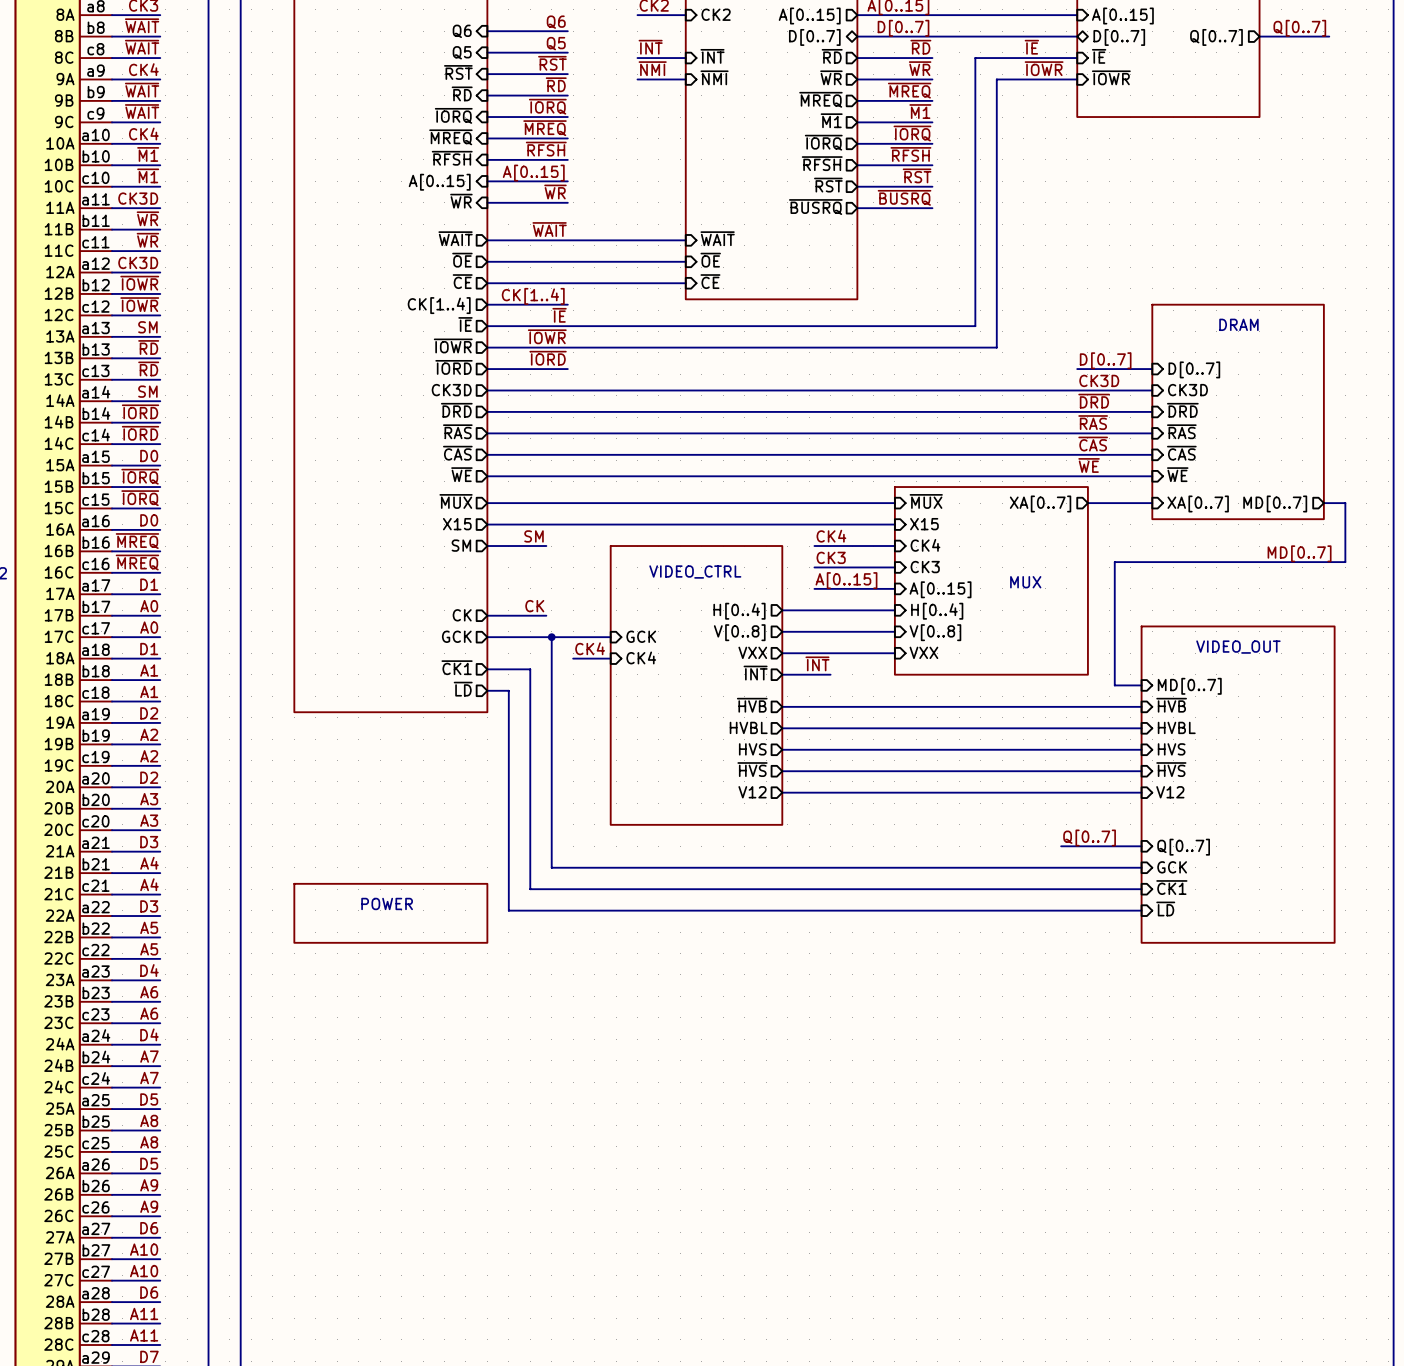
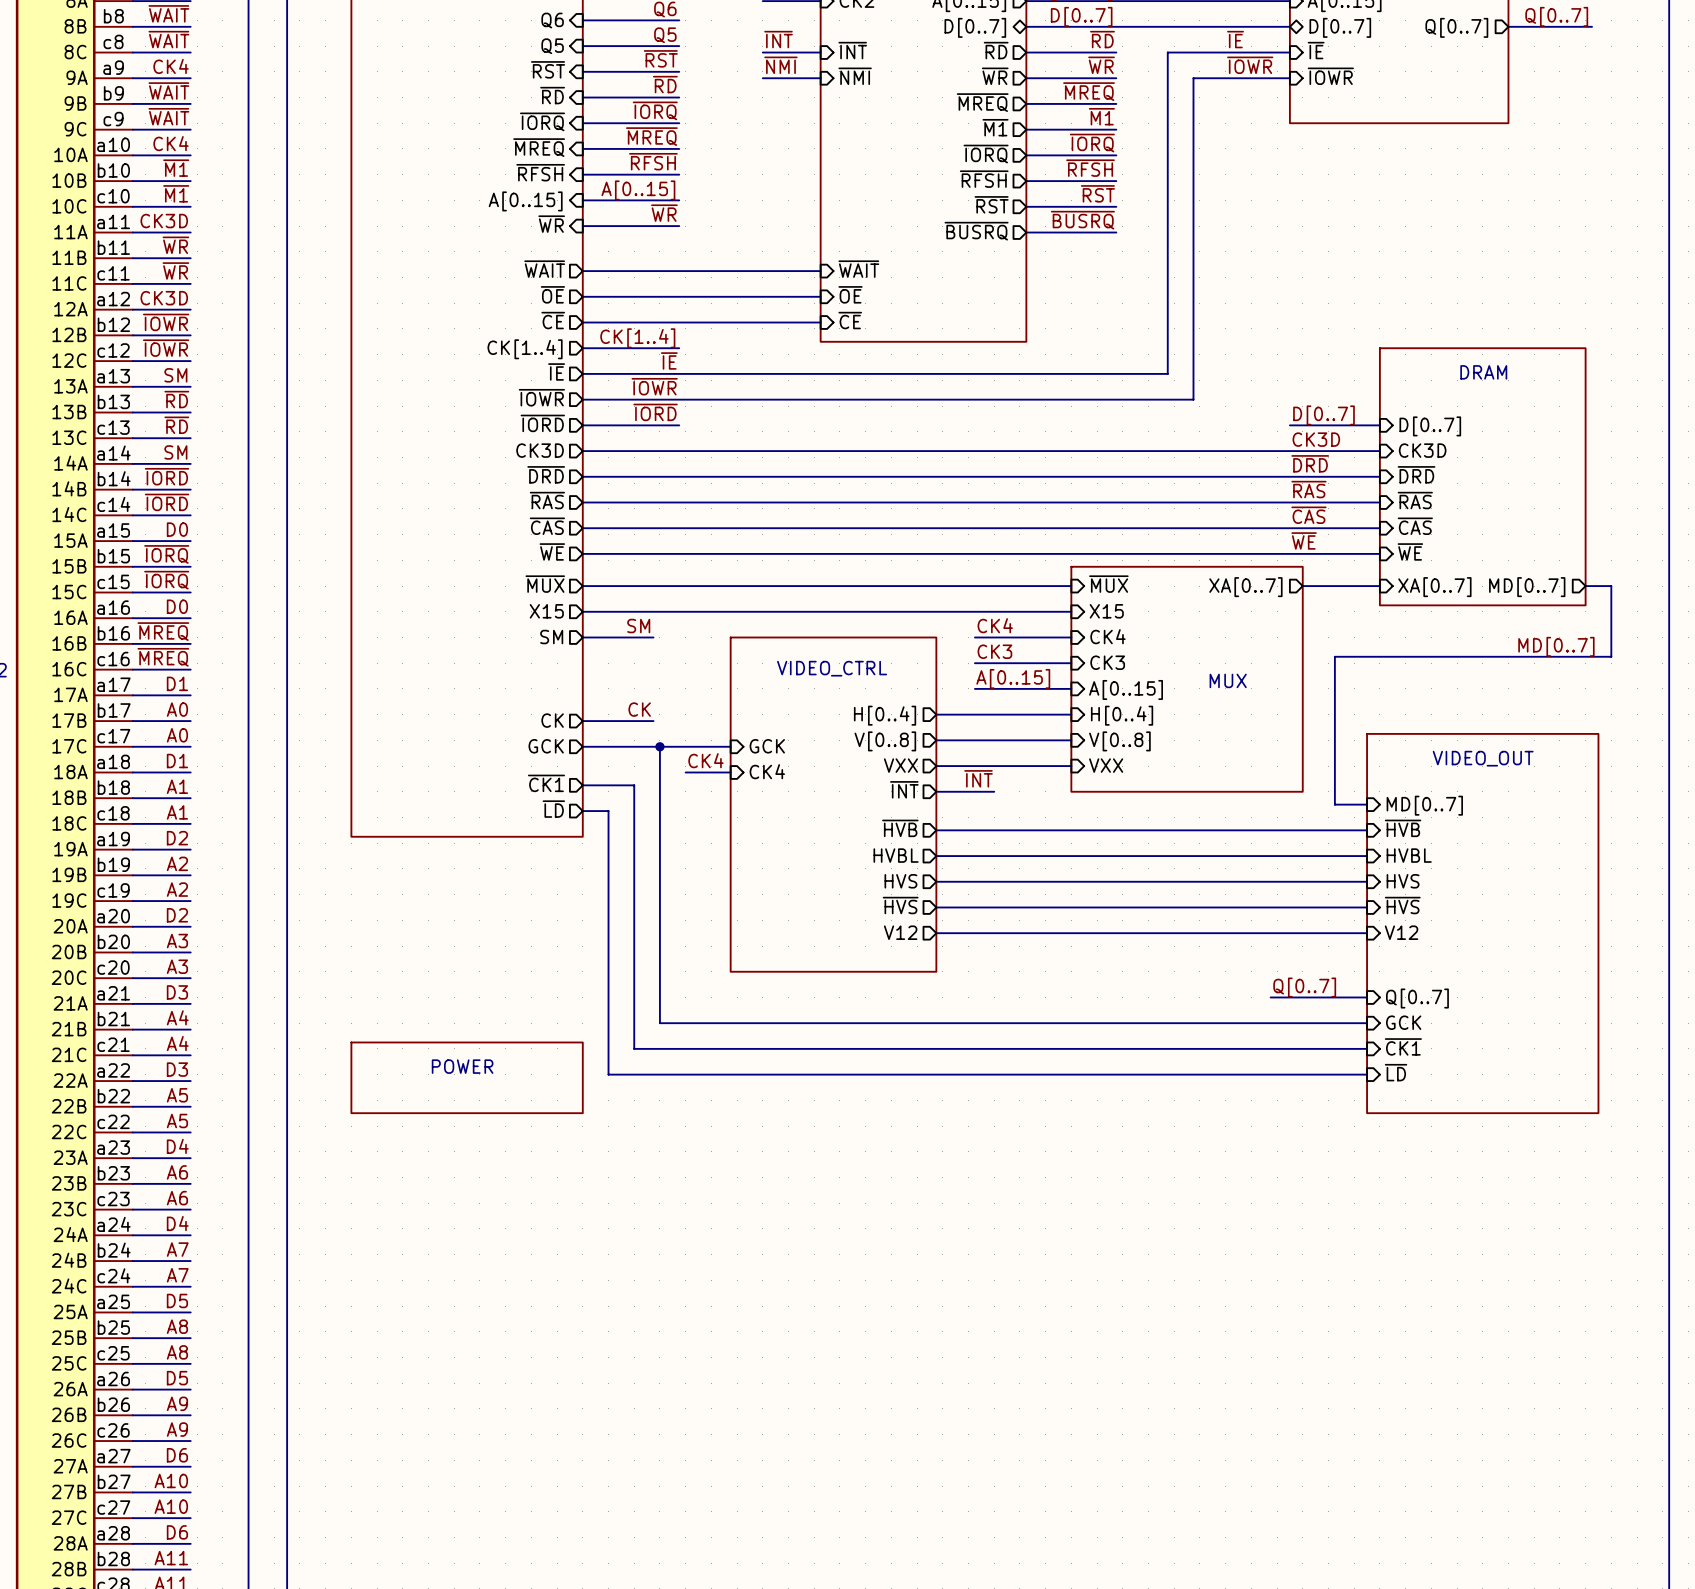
label: ~{WAIT} (549, 229) -> none

